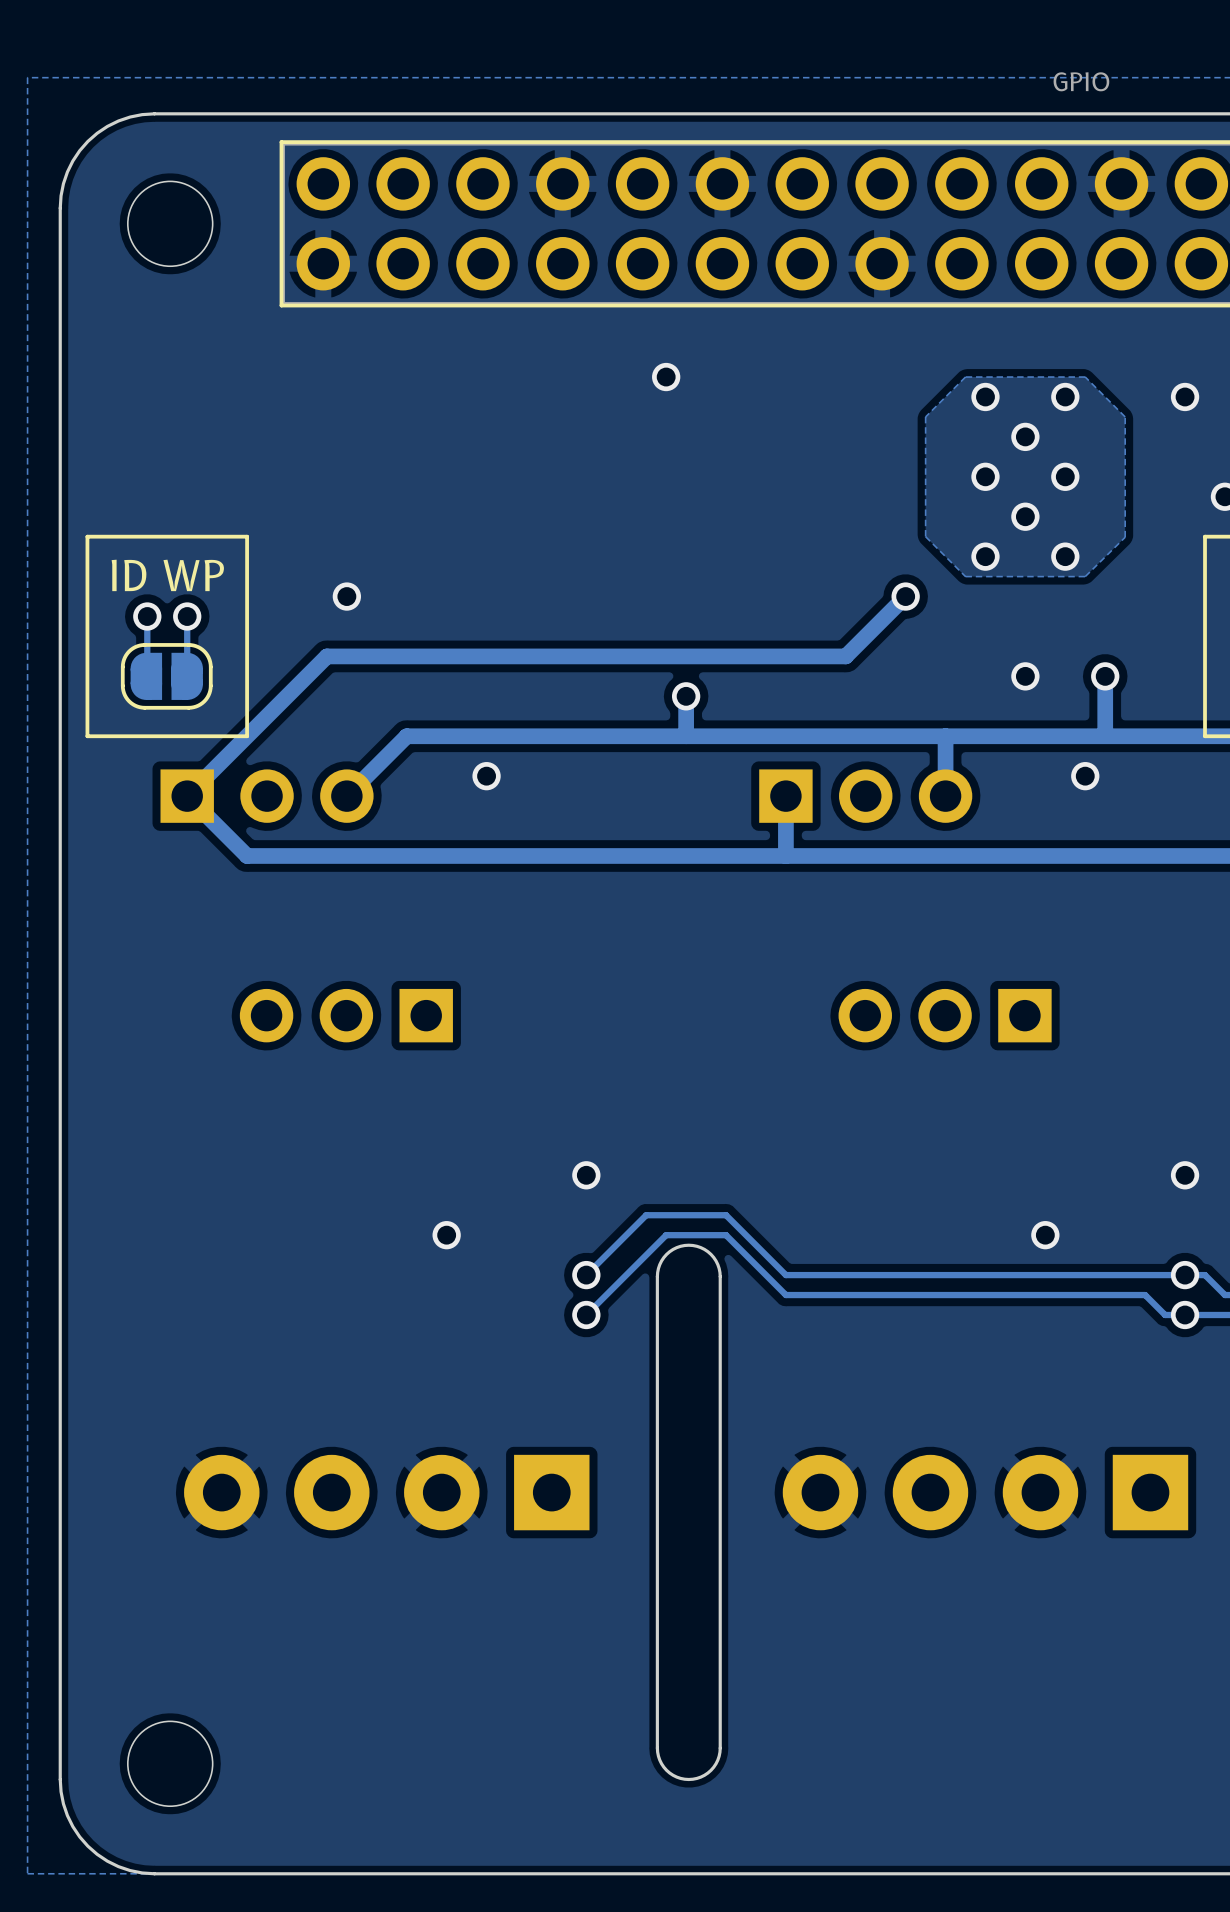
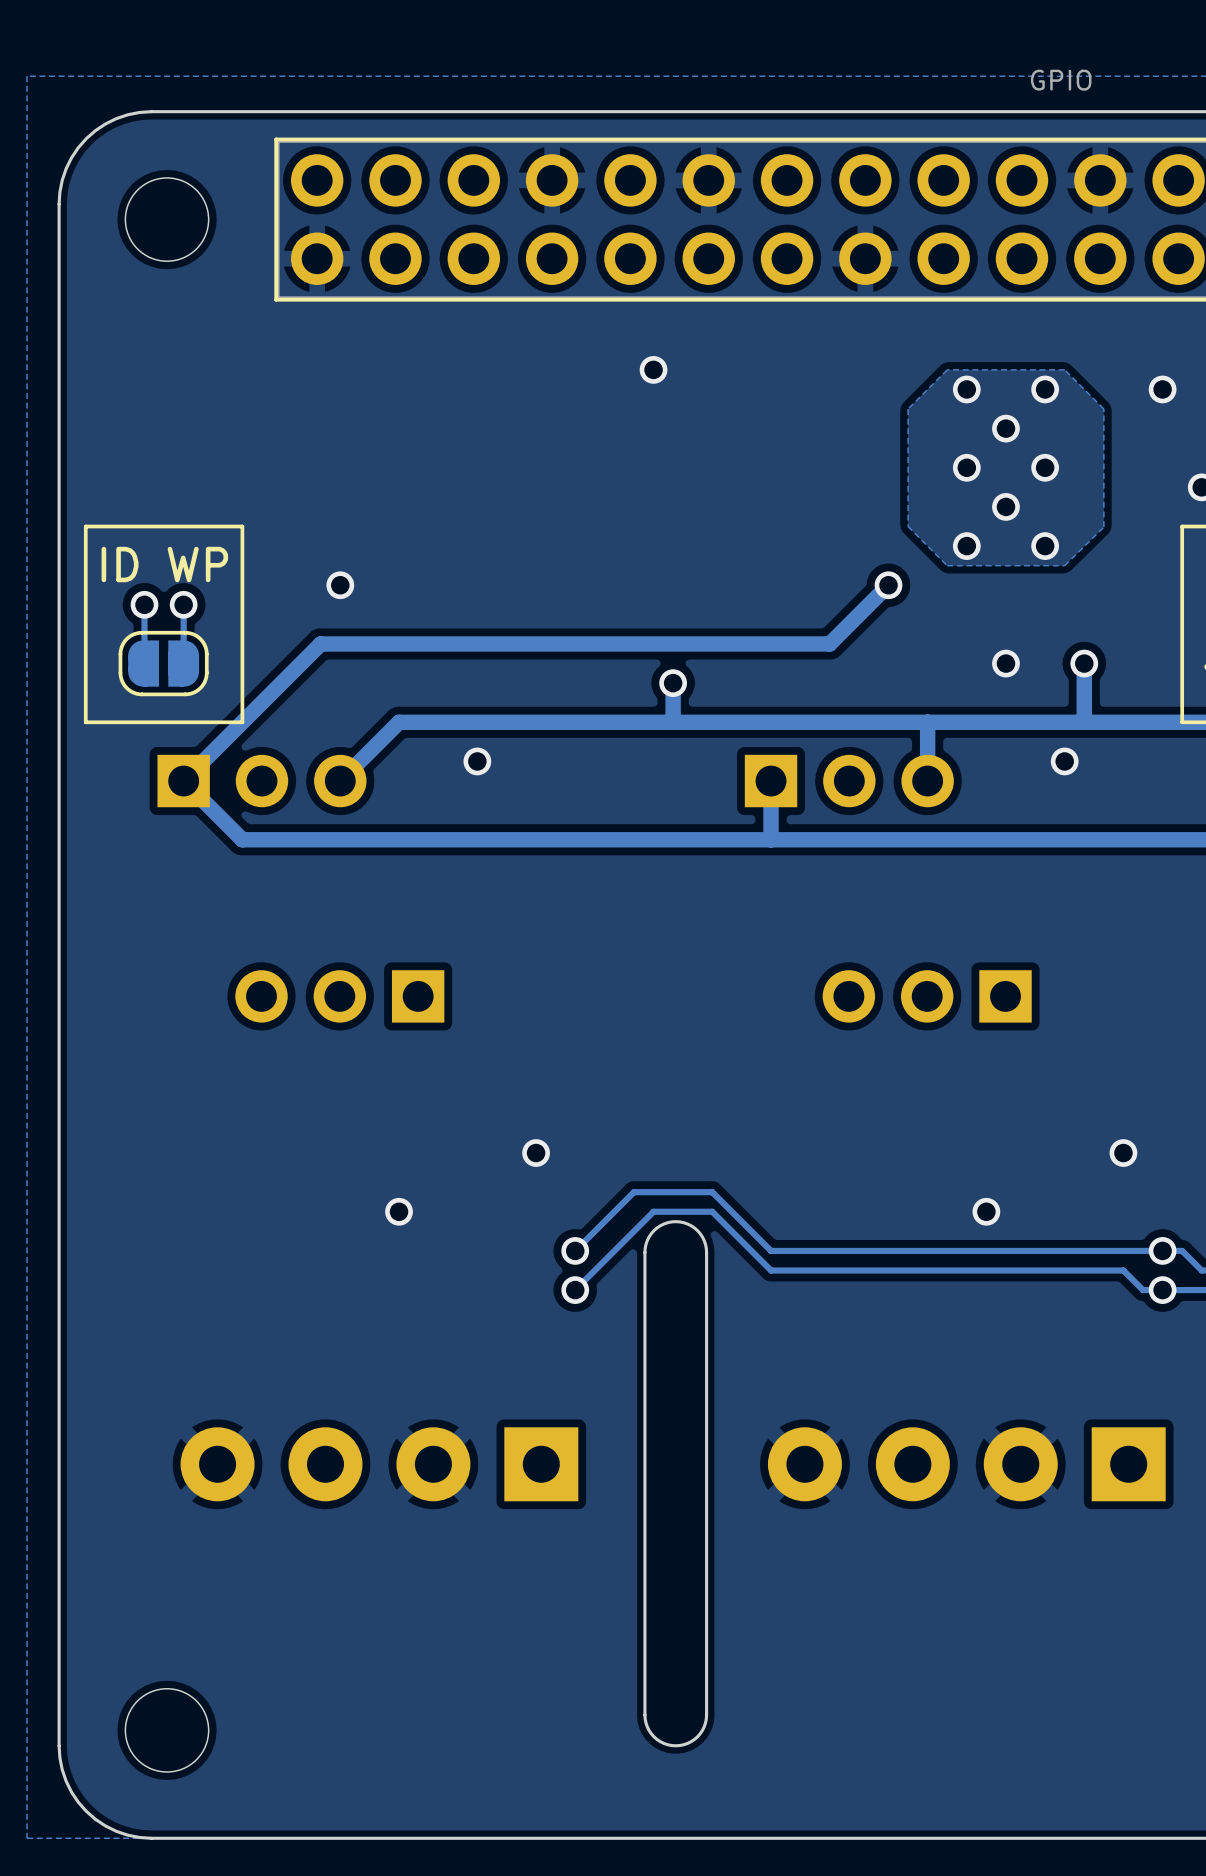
via position: (586, 1175) -> (536, 1153)
via position: (1185, 1175) -> (1123, 1153)
via position: (446, 1235) -> (399, 1211)
via position: (1045, 1235) -> (986, 1211)

